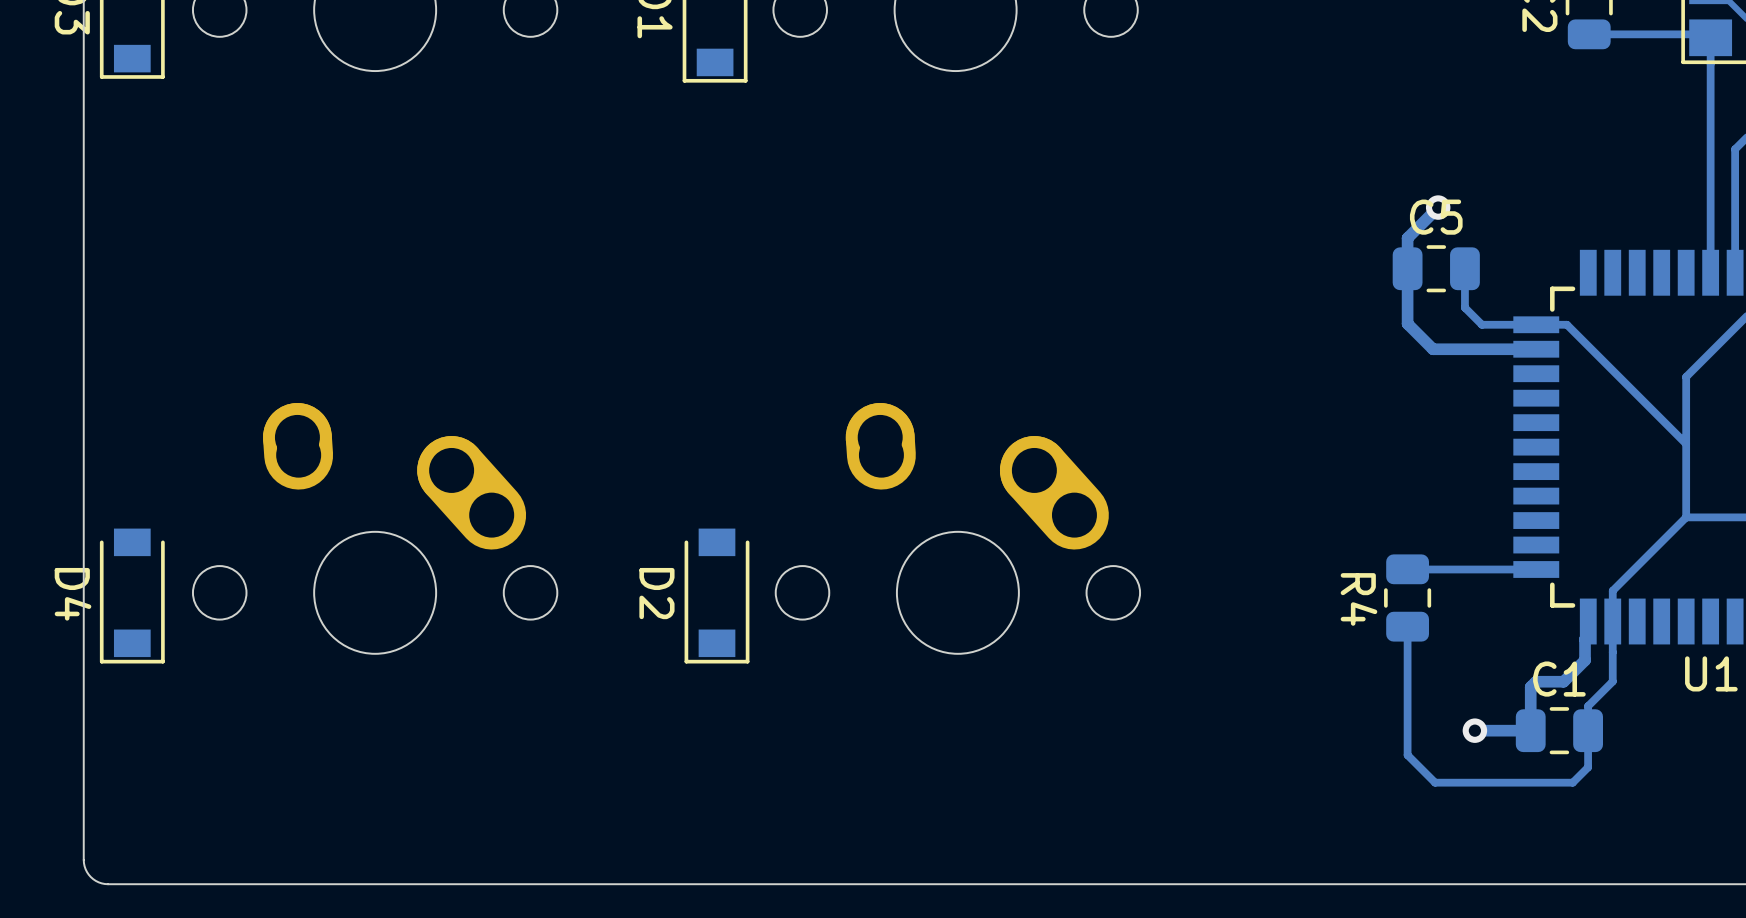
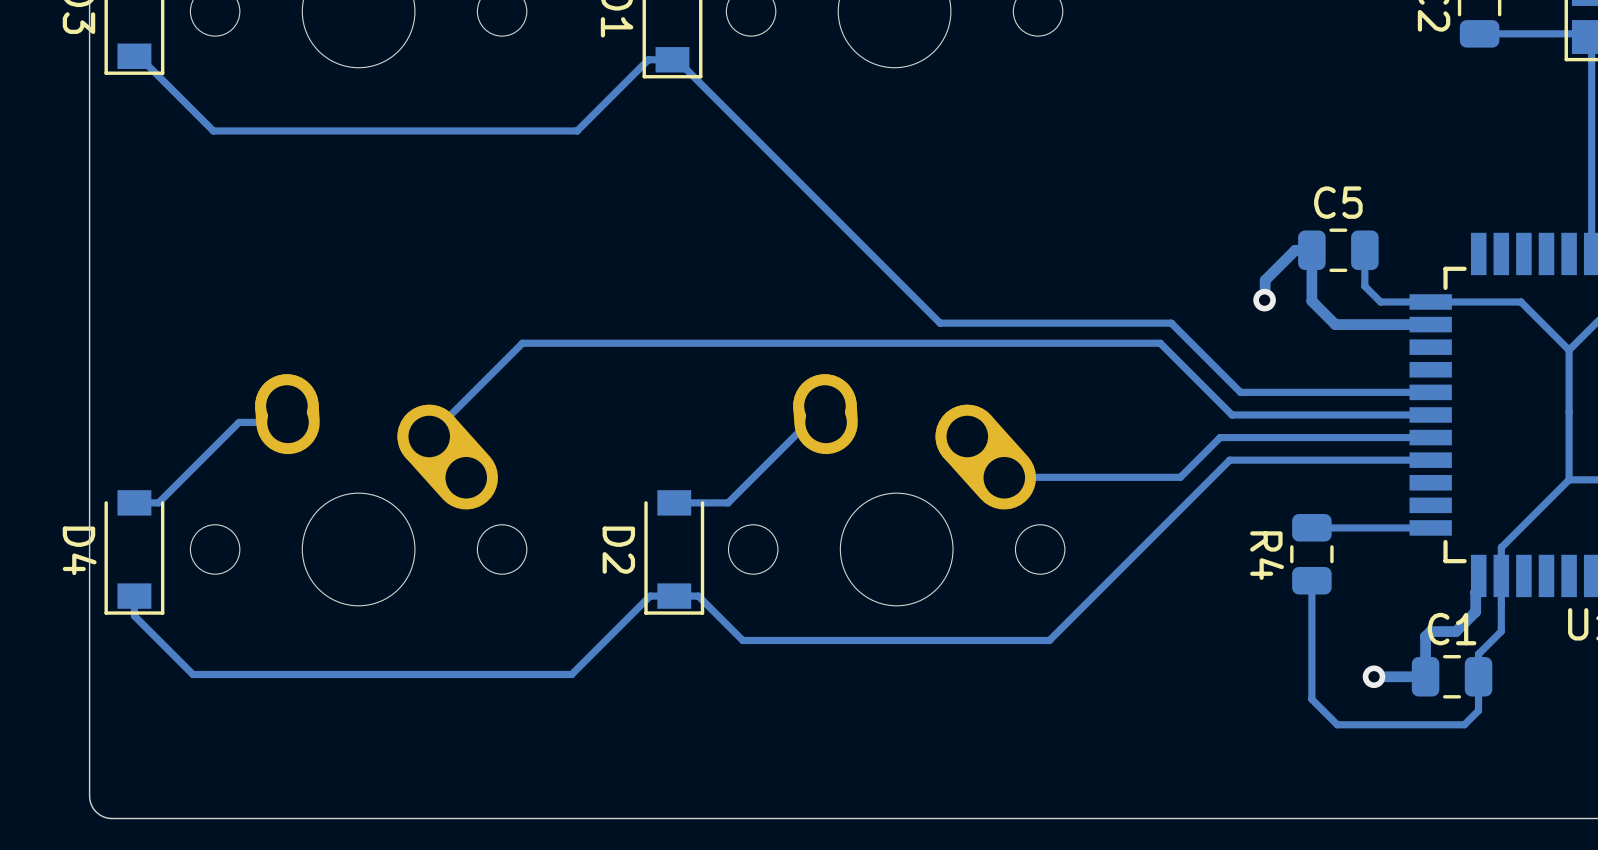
track: none -> (134, 56) (138, 56) (213, 130) (577, 130) (648, 59) (676, 59) (940, 323) (1171, 323) (1240, 392) (1430, 392)
track: (1438, 207) (1407, 238) (1407, 268) -> (1264, 300) (1265, 280) (1295, 250) (1311, 250)
via position: (1438, 207) -> (1264, 300)
track: (1566, 324) (1686, 443) -> (1459, 301) (1520, 301) (1569, 350)
track: none -> (1430, 414) (1231, 414) (1160, 343) (522, 343) (429, 436)
track: none -> (288, 422) (239, 422) (158, 502) (134, 502)
track: none -> (826, 422) (808, 422) (728, 502) (674, 502)
track: none -> (1430, 437) (1220, 437) (1180, 477) (1004, 477)
track: none -> (1430, 460) (1229, 460) (1049, 640) (742, 640) (698, 596) (650, 596) (571, 674) (192, 674) (134, 615) (134, 596)

